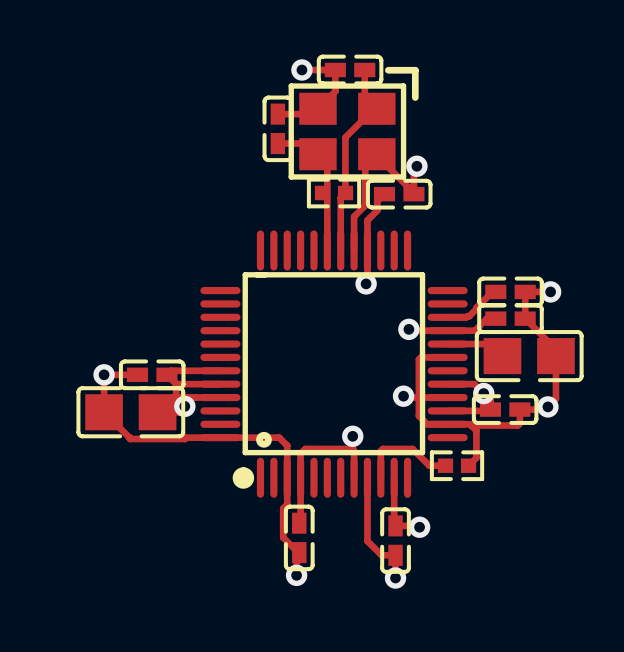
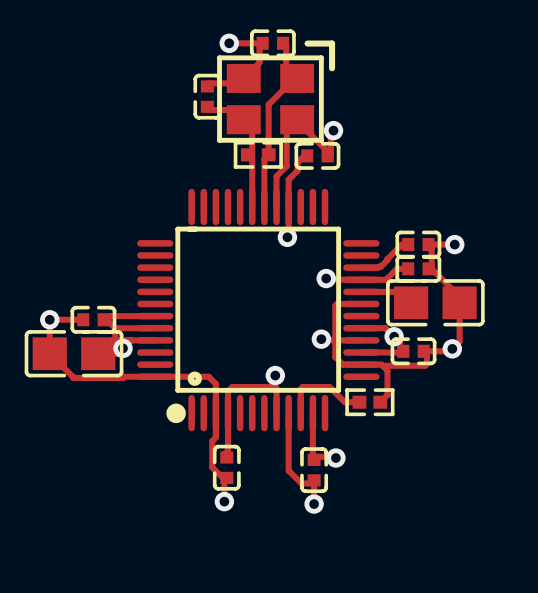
part footprint: [316, 54, 384, 86] -> [249, 29, 296, 58]
part footprint: [262, 95, 294, 163] -> [193, 73, 222, 120]
part footprint: [365, 178, 433, 210] -> [294, 141, 341, 170]
part footprint: [477, 276, 544, 308] -> [395, 230, 442, 259]
part footprint: [477, 303, 544, 335] -> [395, 254, 442, 283]
part footprint: [118, 359, 186, 391] -> [70, 305, 117, 334]
part footprint: [471, 394, 539, 425] -> [390, 337, 437, 366]
part footprint: [283, 504, 315, 572] -> [212, 444, 241, 491]
part footprint: [380, 507, 411, 574] -> [300, 447, 329, 494]

